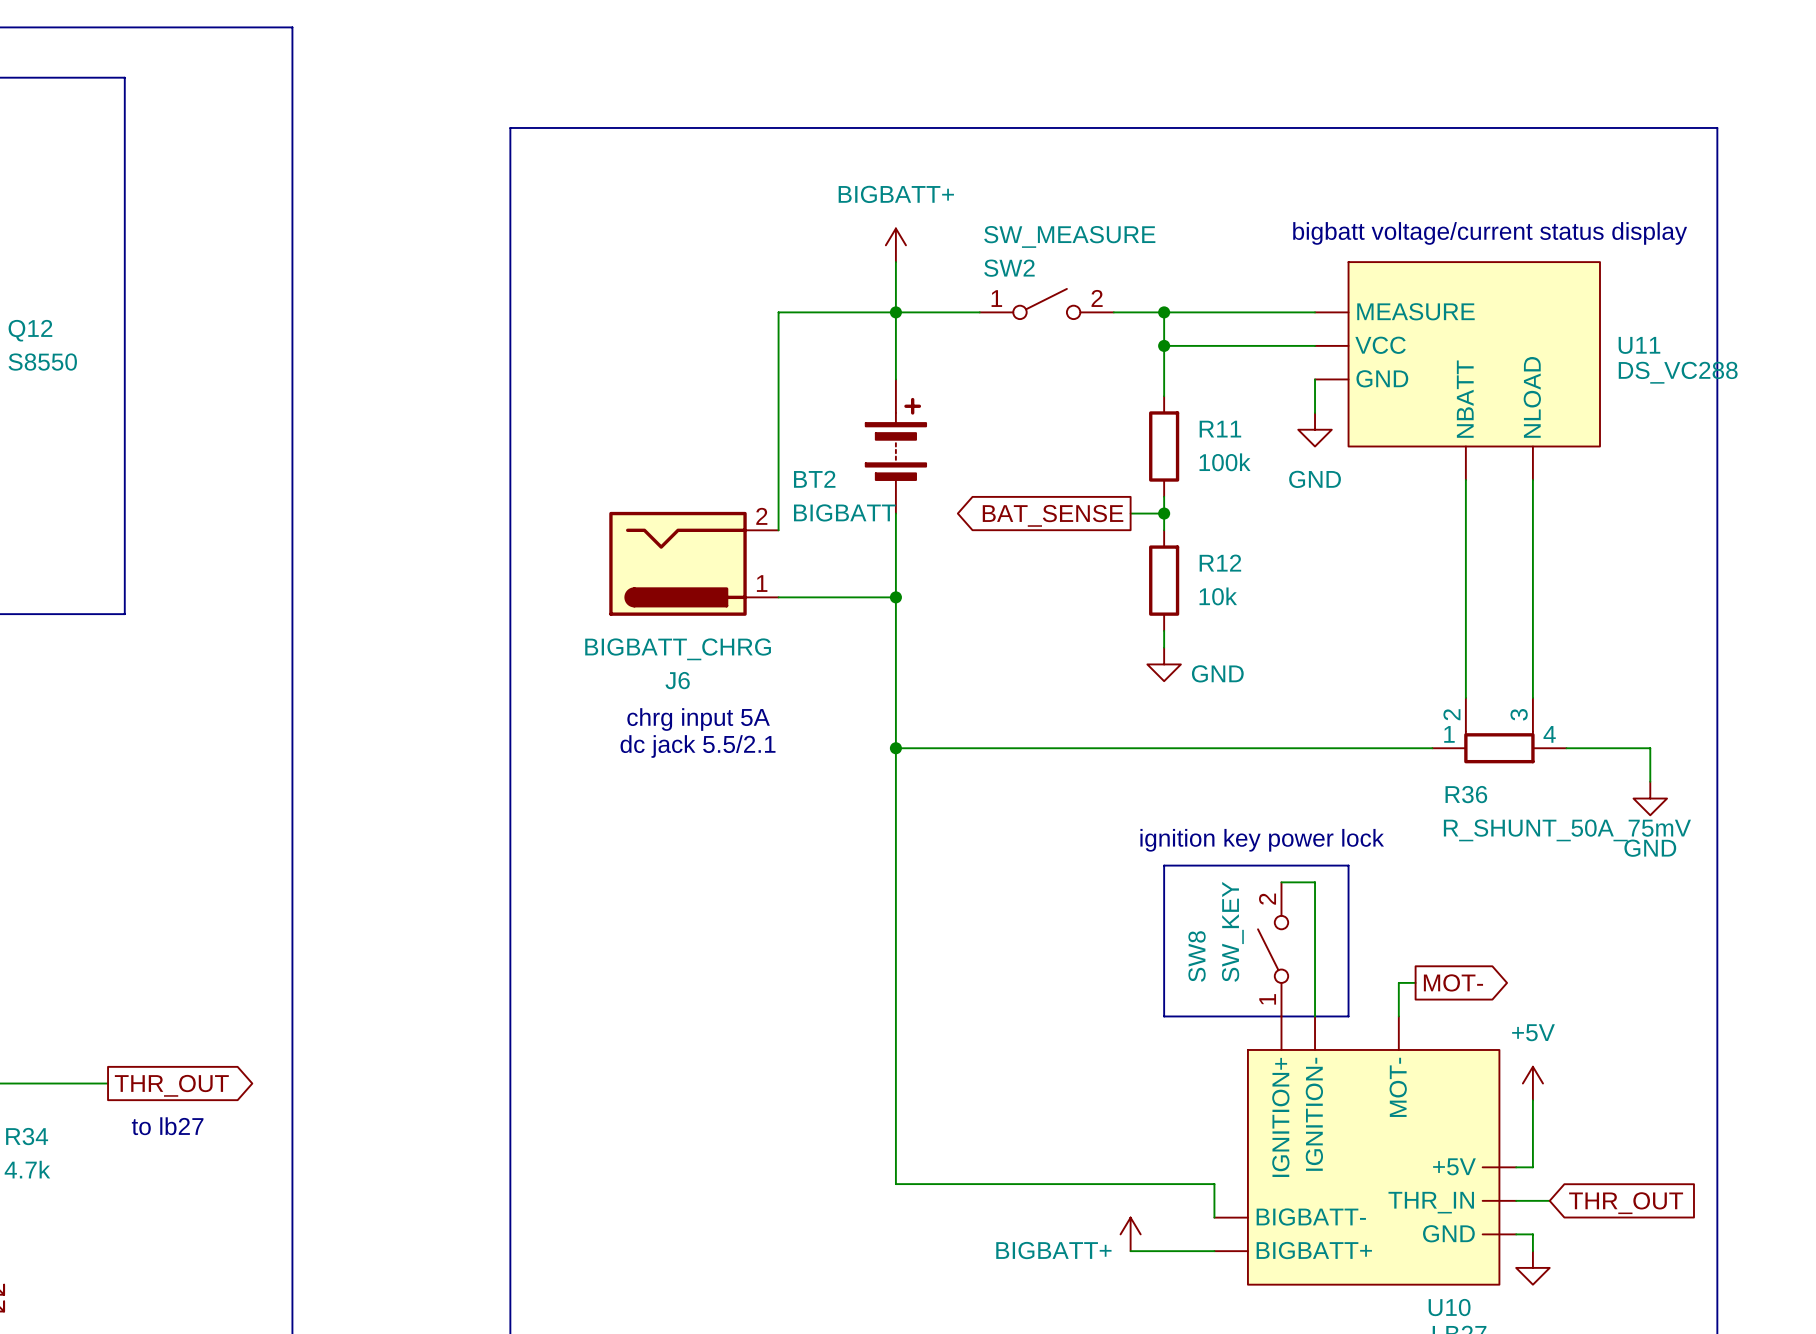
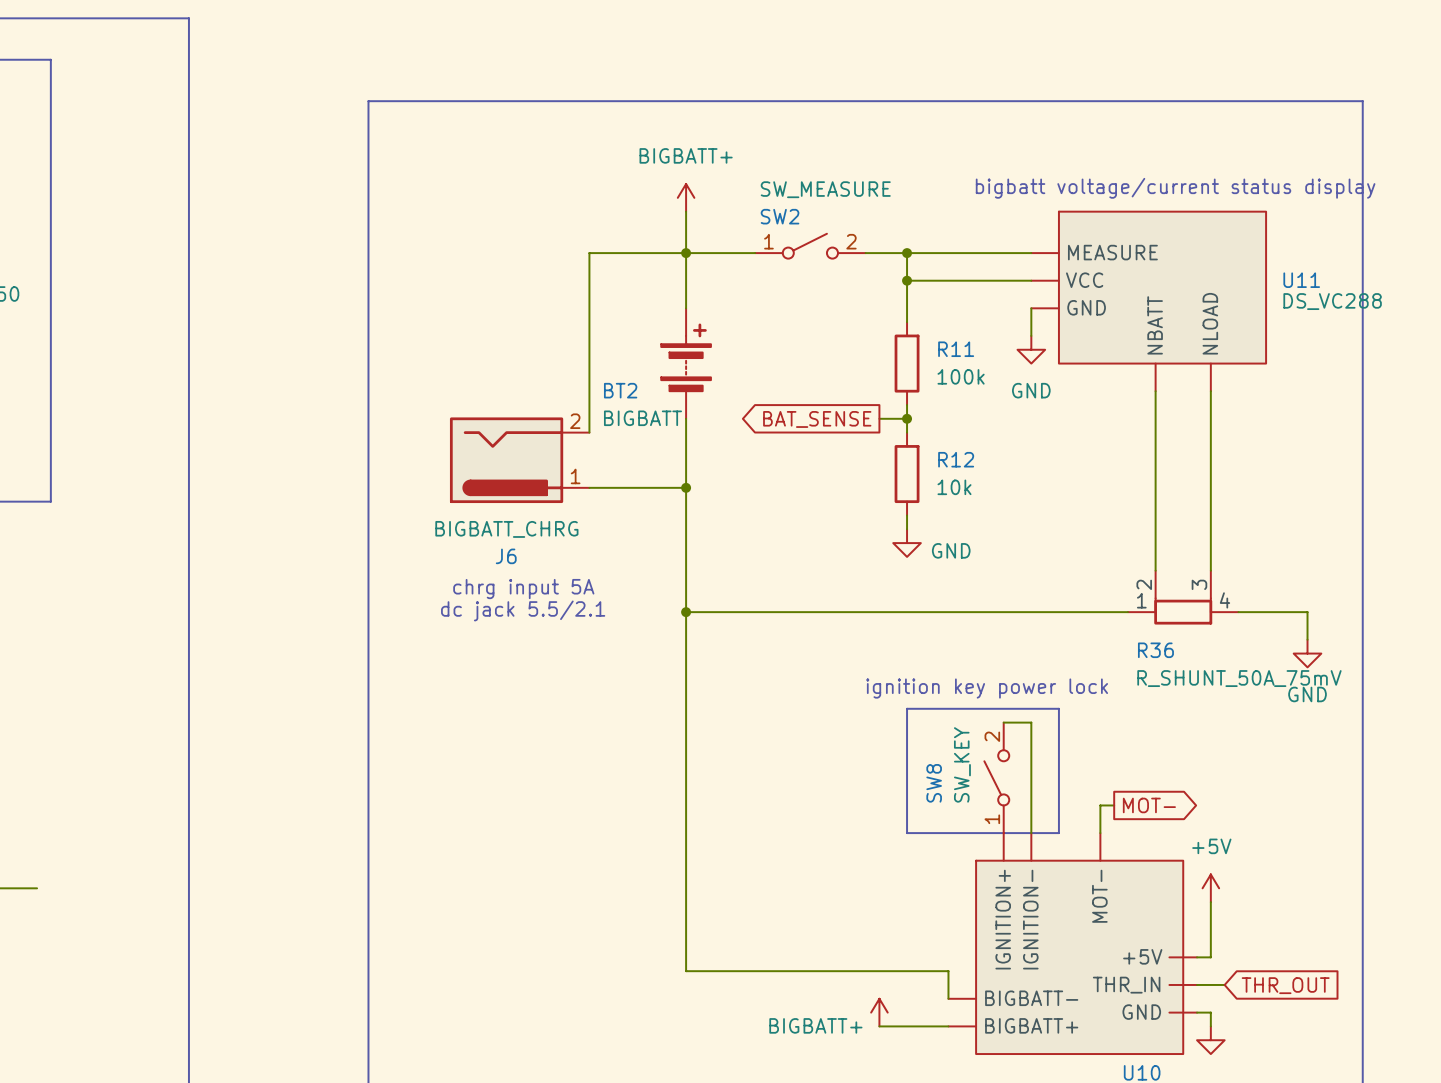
global label: THR_OUT (171, 1085) -> none
text: to lb27 (167, 1126) -> none

